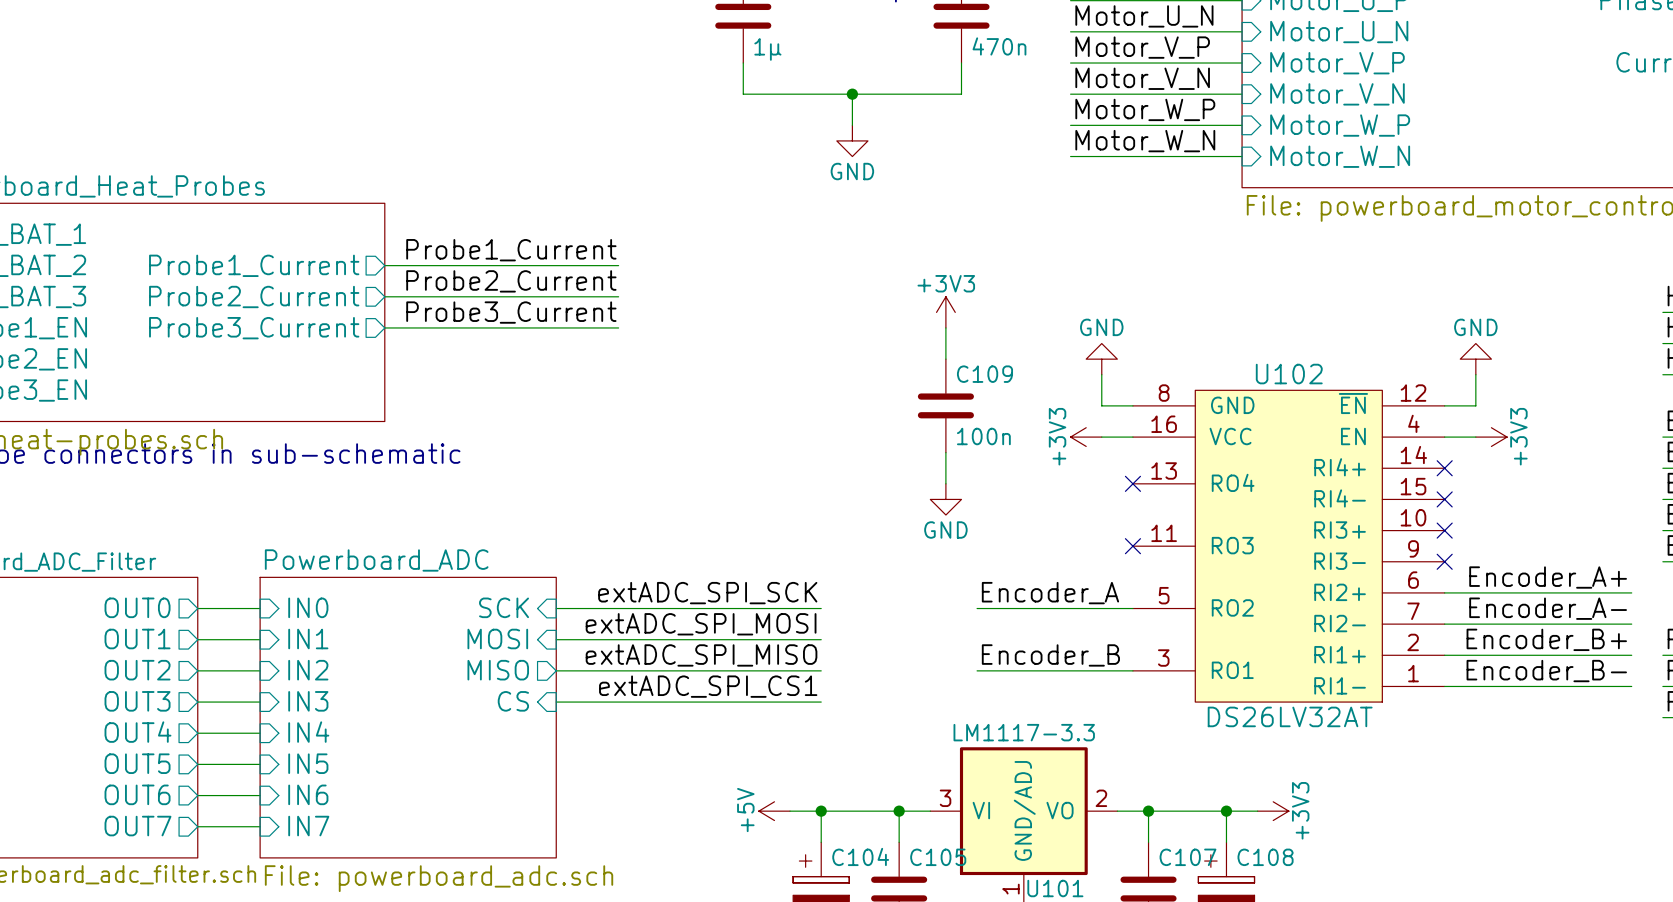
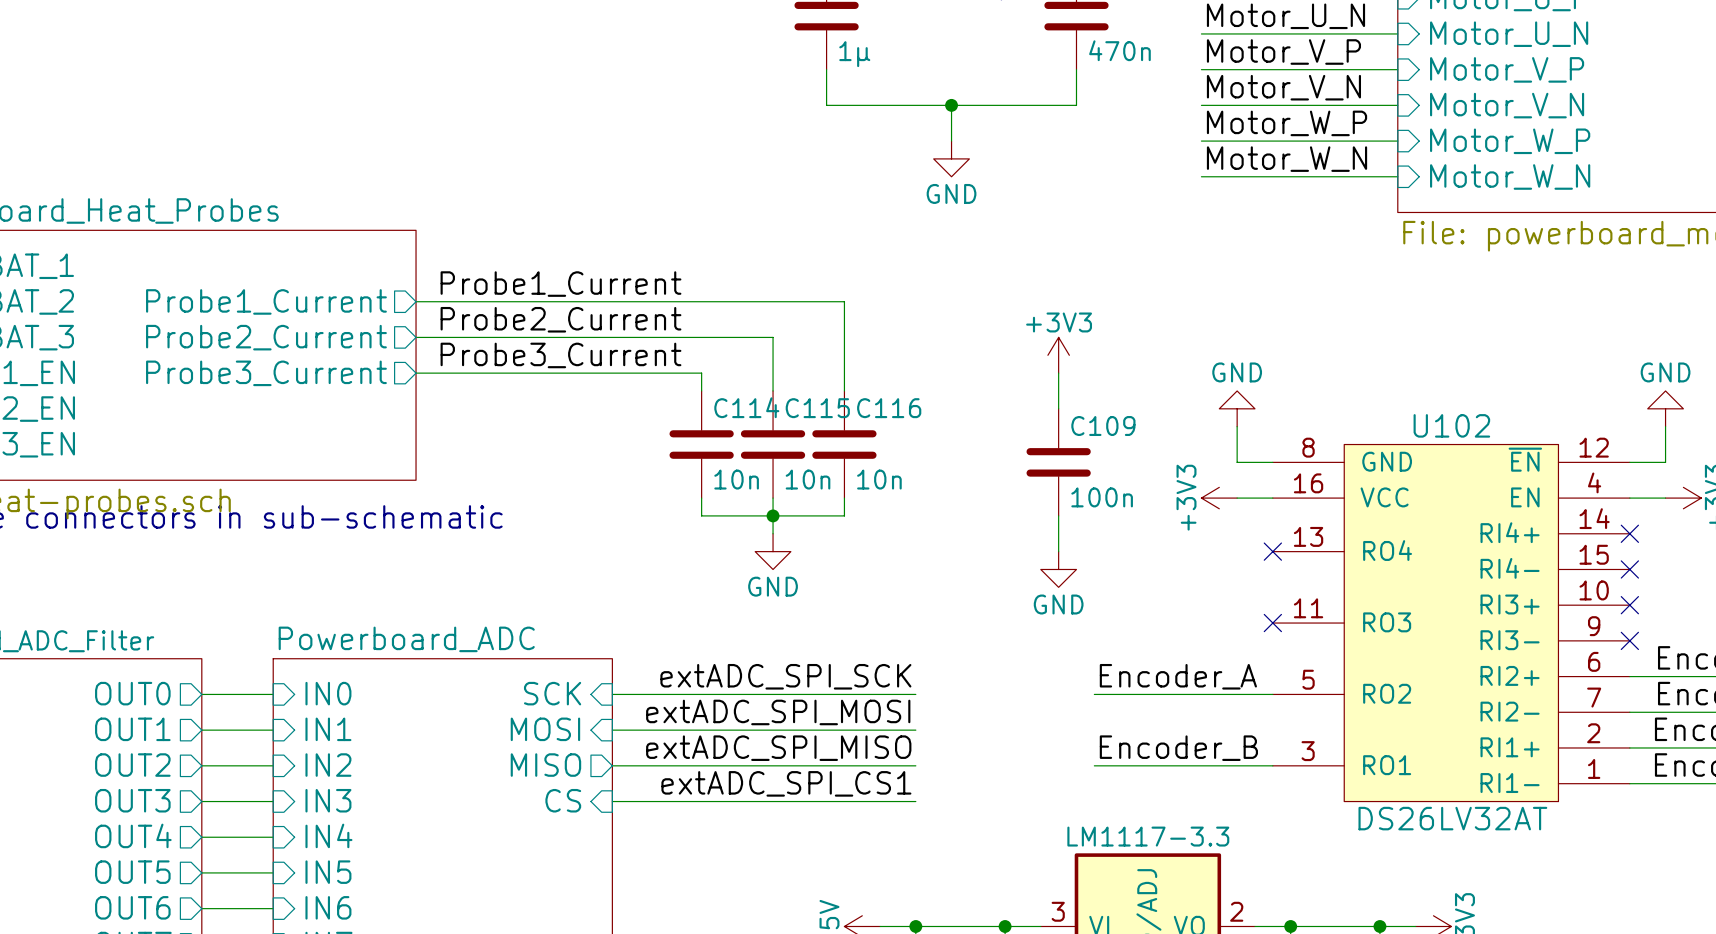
wire: none -> (683, 301) (844, 301) (844, 390)
wire: none -> (683, 337) (773, 337) (773, 390)
wire: none -> (683, 373) (701, 373) (701, 390)
C114: none -> 10n (701, 444)
C115: none -> 10n (773, 444)
C116: none -> 10n (844, 444)
wire: none -> (701, 498) (701, 515) (844, 515) (844, 498)
wire: none -> (773, 498) (773, 533)
junction: none -> (773, 515)
power symbol: none -> GND (773, 551)

